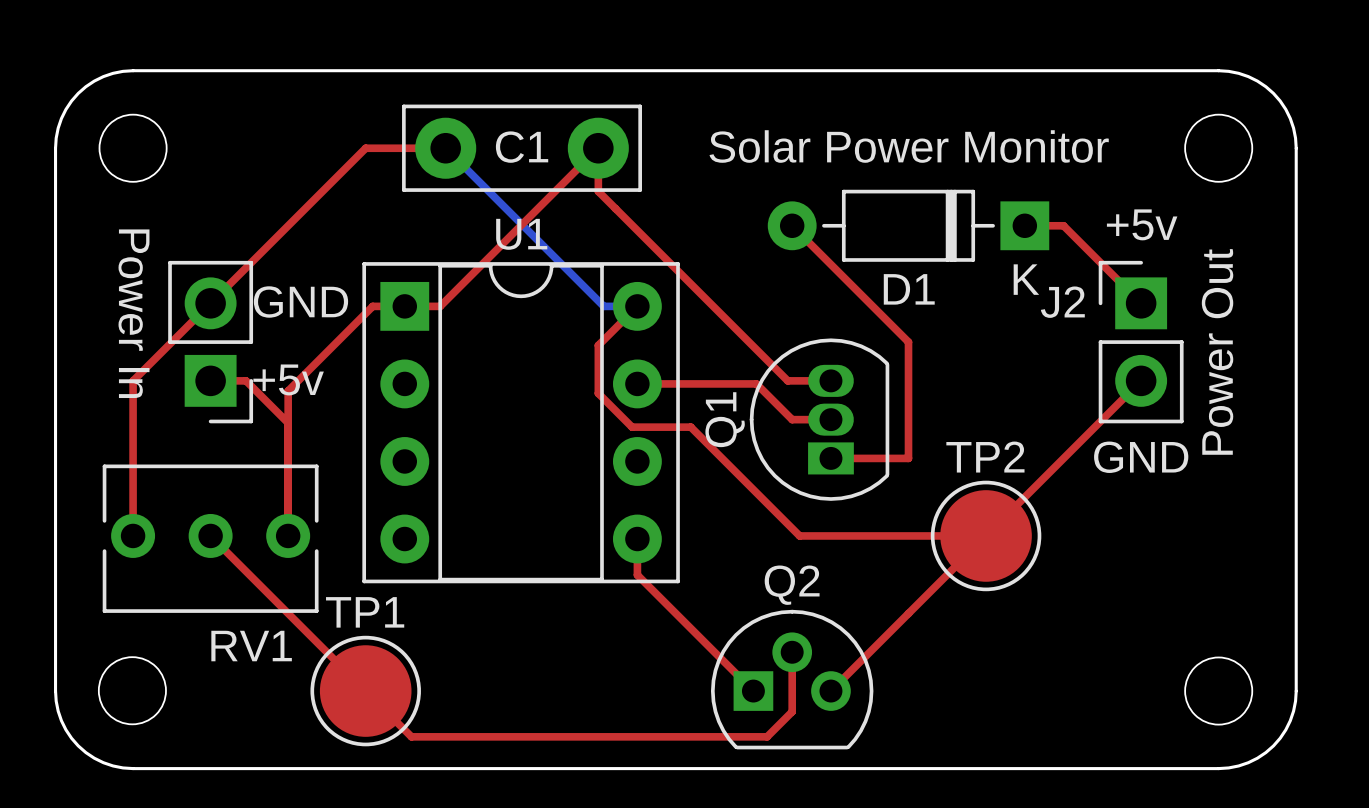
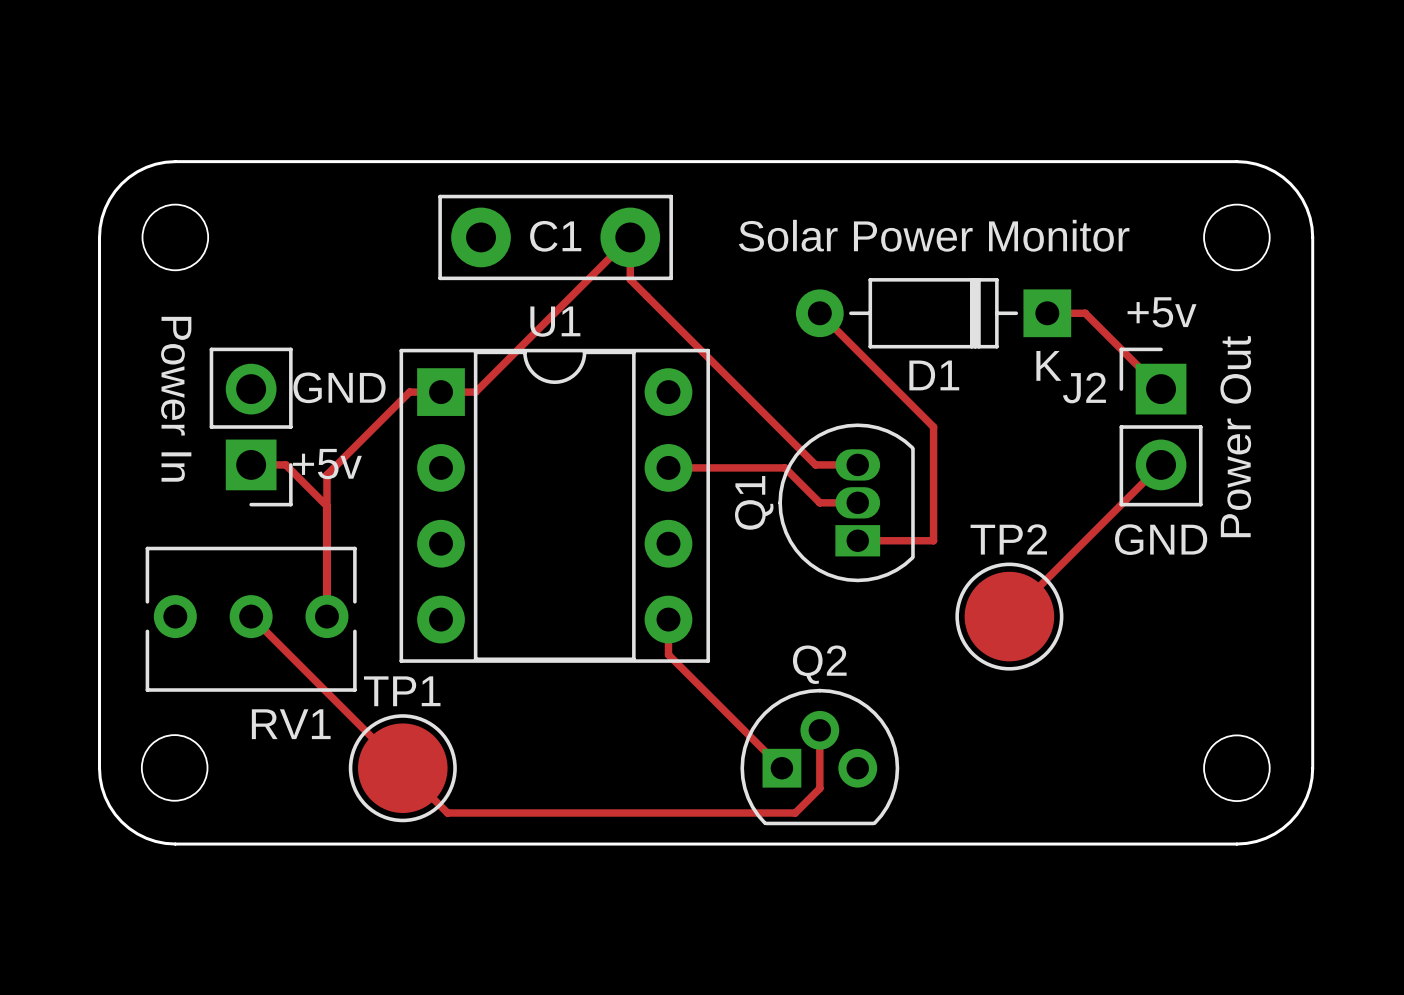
top track: (445, 148) (365, 148) (133, 380) (133, 535) -> none
bottom track: (445, 148) (603, 306) (637, 306) -> none
top track: (637, 306) (598, 345) (598, 393) (632, 427) (690, 427) (799, 535) (986, 535) (830, 691) -> none

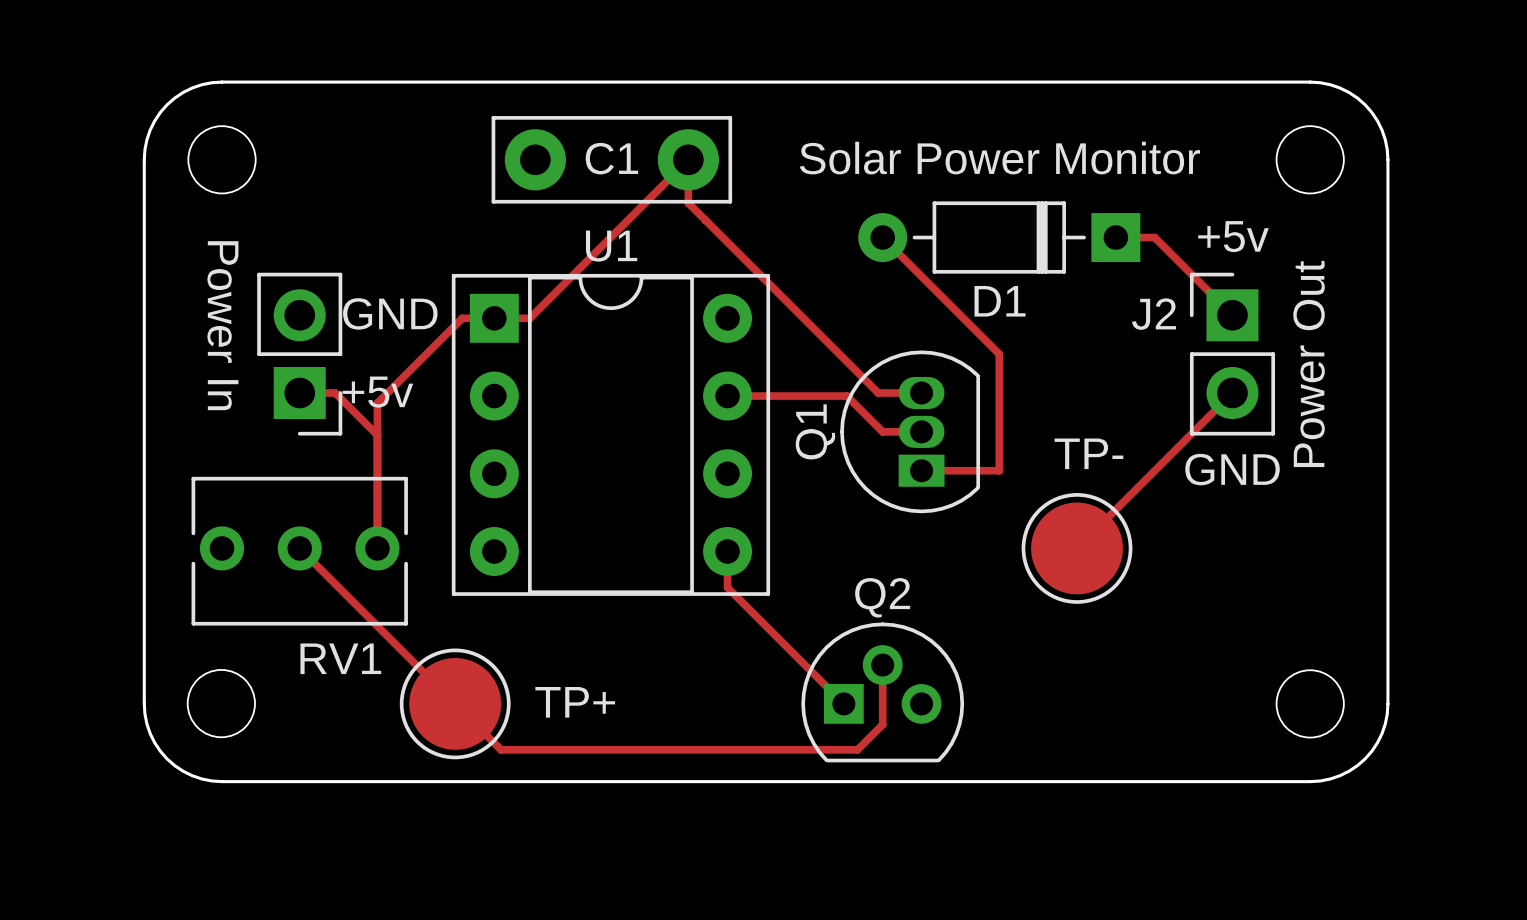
D1 text: K (1048, 365) -> none
text: none -> TP- (1088, 453)
TP2 name: TP2 (1008, 539) -> none
TP1 name: TP1 (402, 691) -> none
text: none -> TP+ (575, 702)

